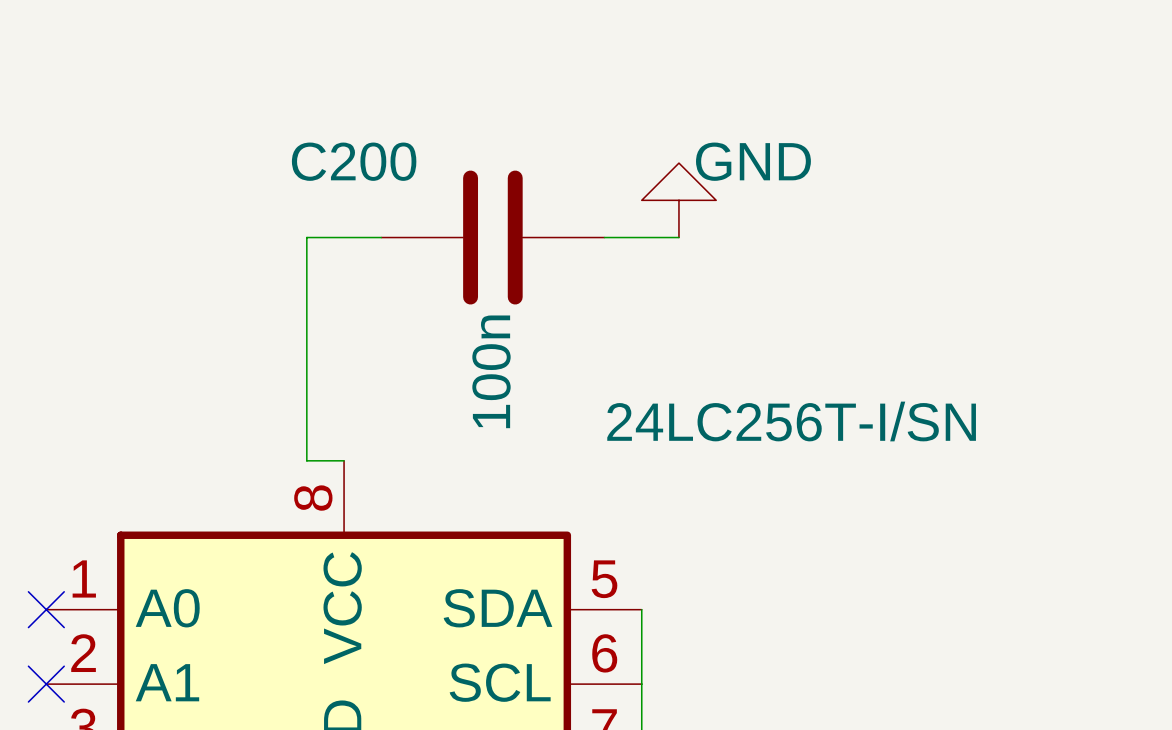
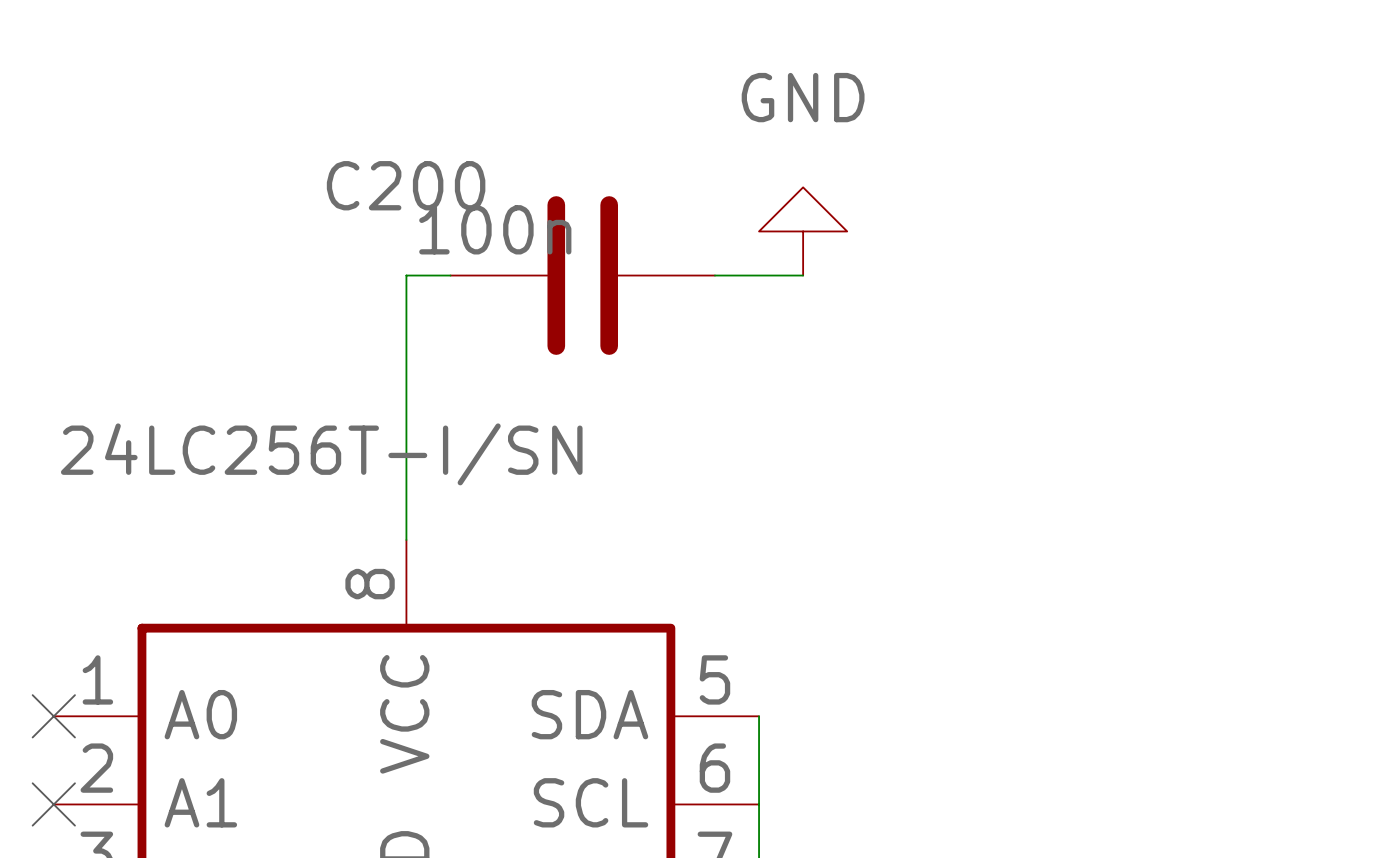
power symbol text position: GND (753, 161) -> GND (803, 97)
wire: (344, 237) (306, 237) (306, 460) (344, 460) -> (406, 275) (406, 539)
C200 value rotation: 0° (491, 371) -> 90° clockwise (495, 229)
C200 value position: 100n (491, 371) -> 100n (495, 229)
part value position: 24LC256T-I/SN (791, 421) -> 24LC256T-I/SN (321, 454)

